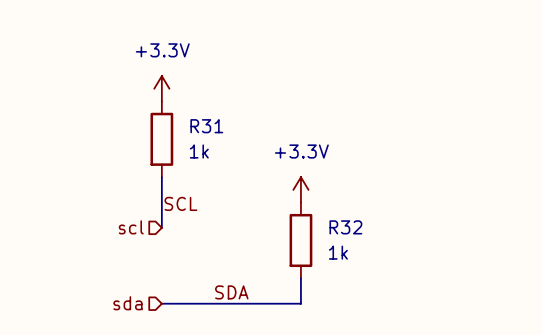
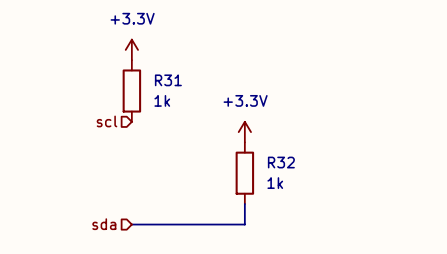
wire: (161, 177) (161, 227) -> none
label: SCL (180, 203) -> none
hierarchical label position: scl (131, 227) -> scl (107, 121)
label: SDA (231, 292) -> none

